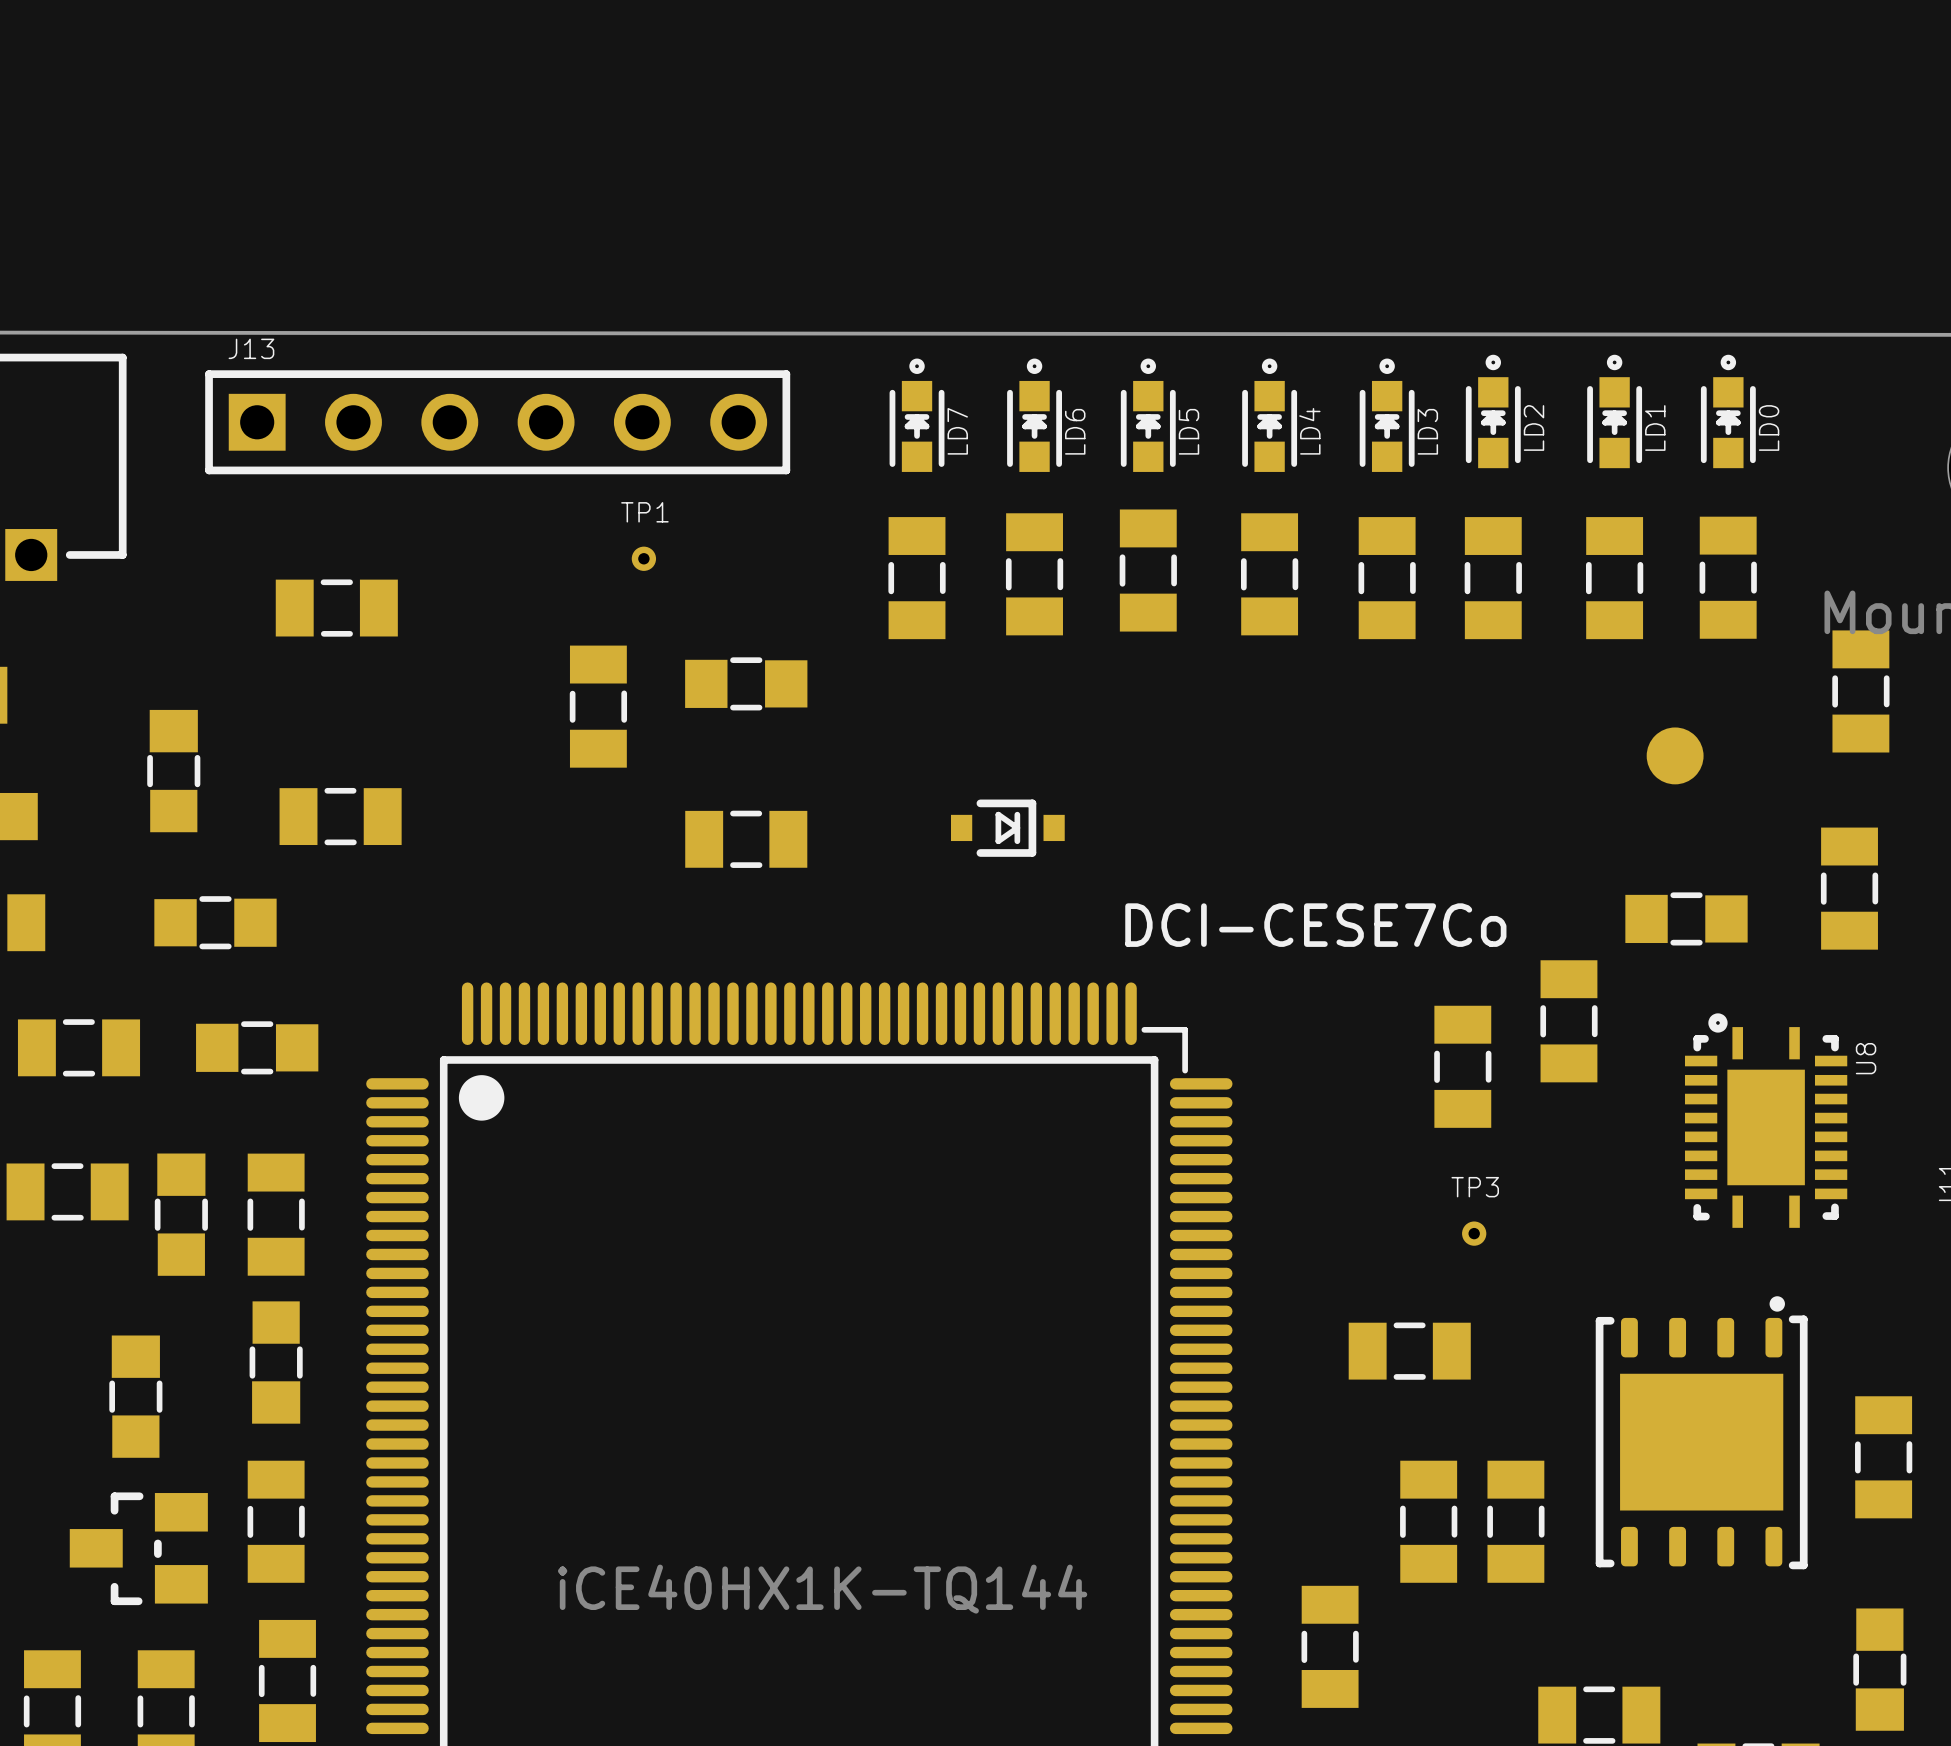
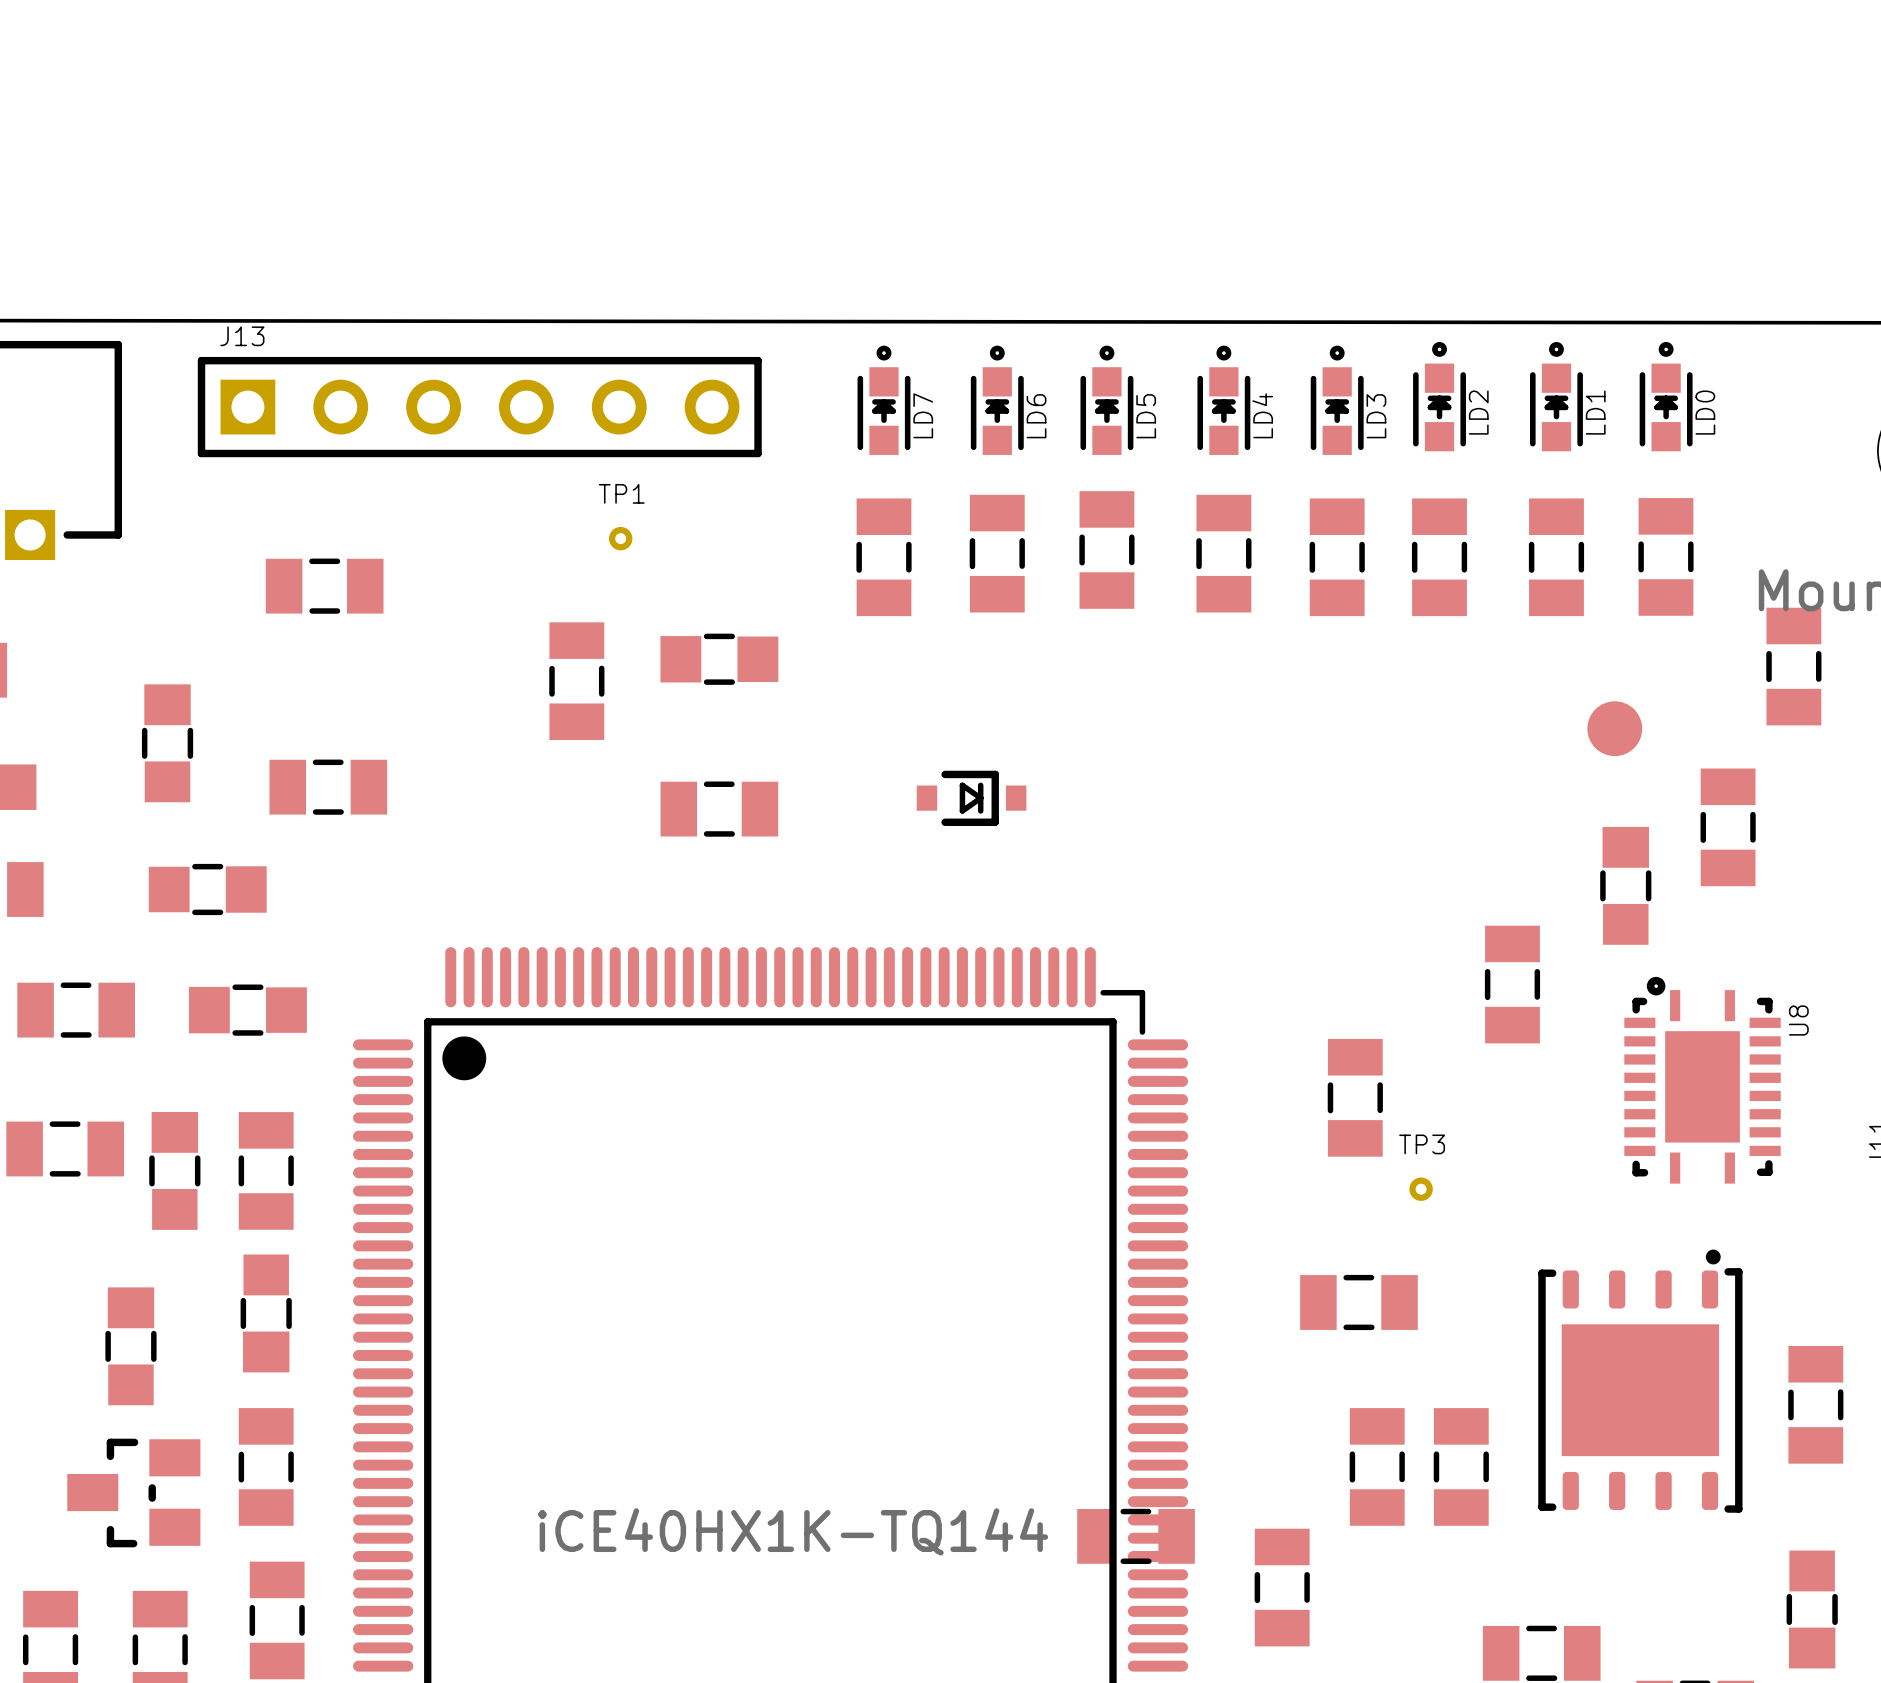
part position: (1849, 888) -> (1728, 827)
part rotation: 0° (1686, 918) -> 90° clockwise (1625, 885)
text: DCI-CESE7Co (1315, 925) -> none
part position: (1462, 1066) -> (1355, 1097)
part: none -> (1136, 1536)

